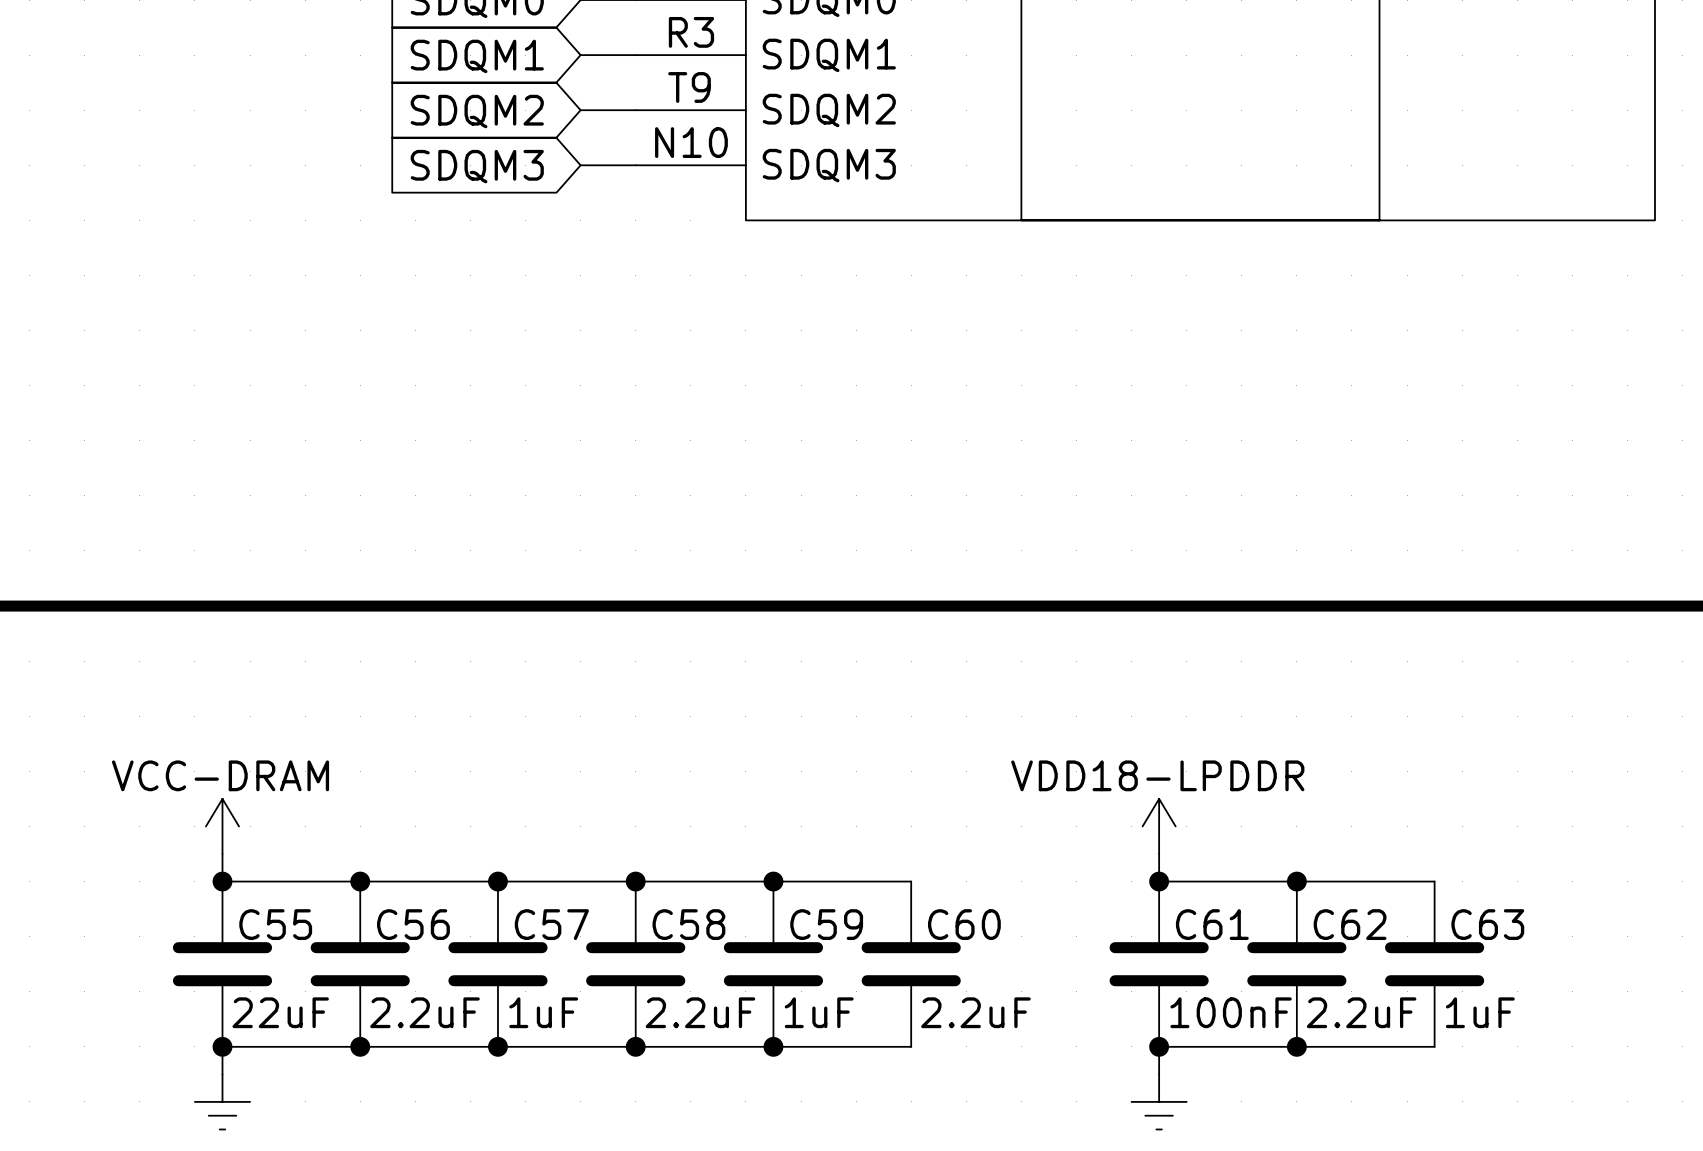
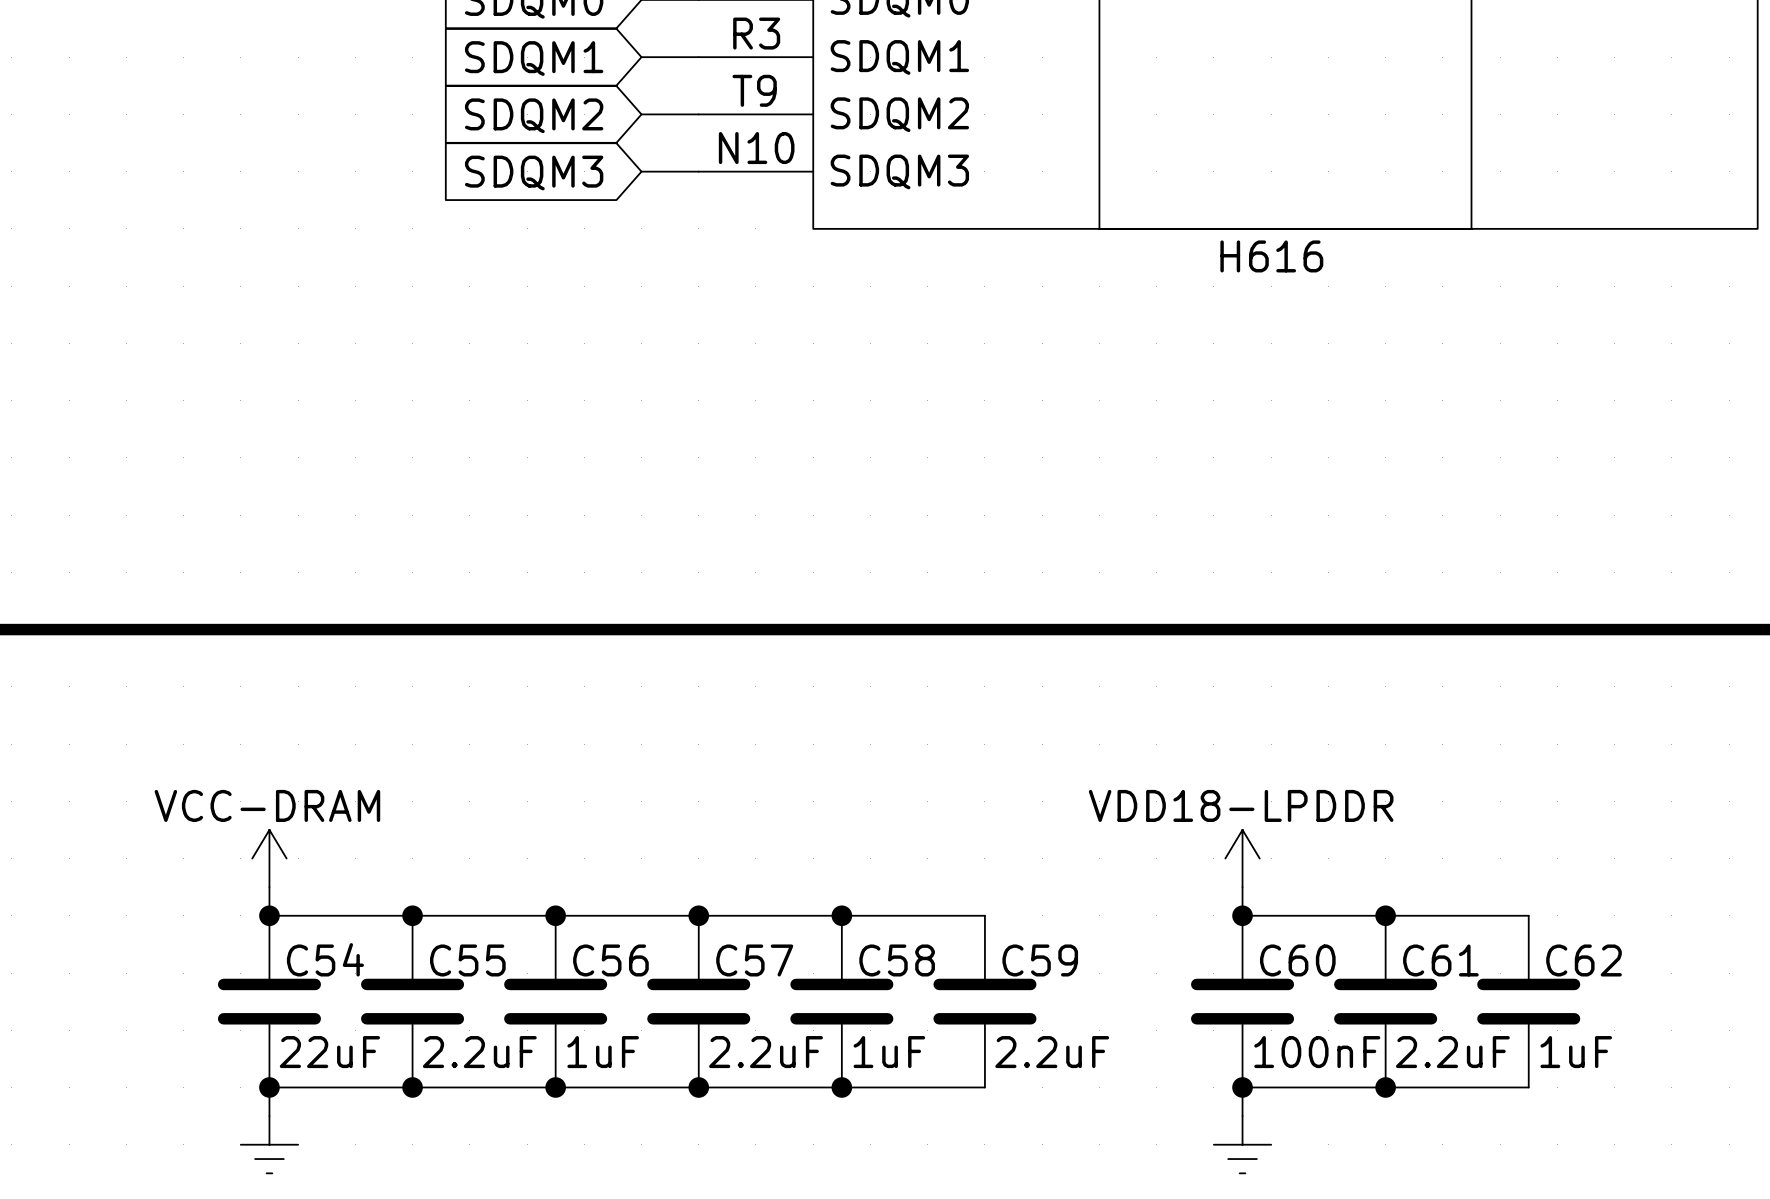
part value: none -> H616 (1271, 256)
C55 name: C55 (275, 924) -> C54 (325, 959)
C56 name: C56 (413, 924) -> C55 (467, 960)
C57 name: C57 (551, 924) -> C56 (610, 960)
C58 name: C58 (688, 924) -> C57 (754, 960)
C59 name: C59 (826, 924) -> C58 (897, 960)
C60 name: C60 (964, 924) -> C59 (1040, 960)
C61 name: C61 (1212, 924) -> C60 (1297, 960)
C62 name: C62 (1350, 924) -> C61 (1440, 960)
C63 name: C63 (1487, 924) -> C62 (1584, 960)

